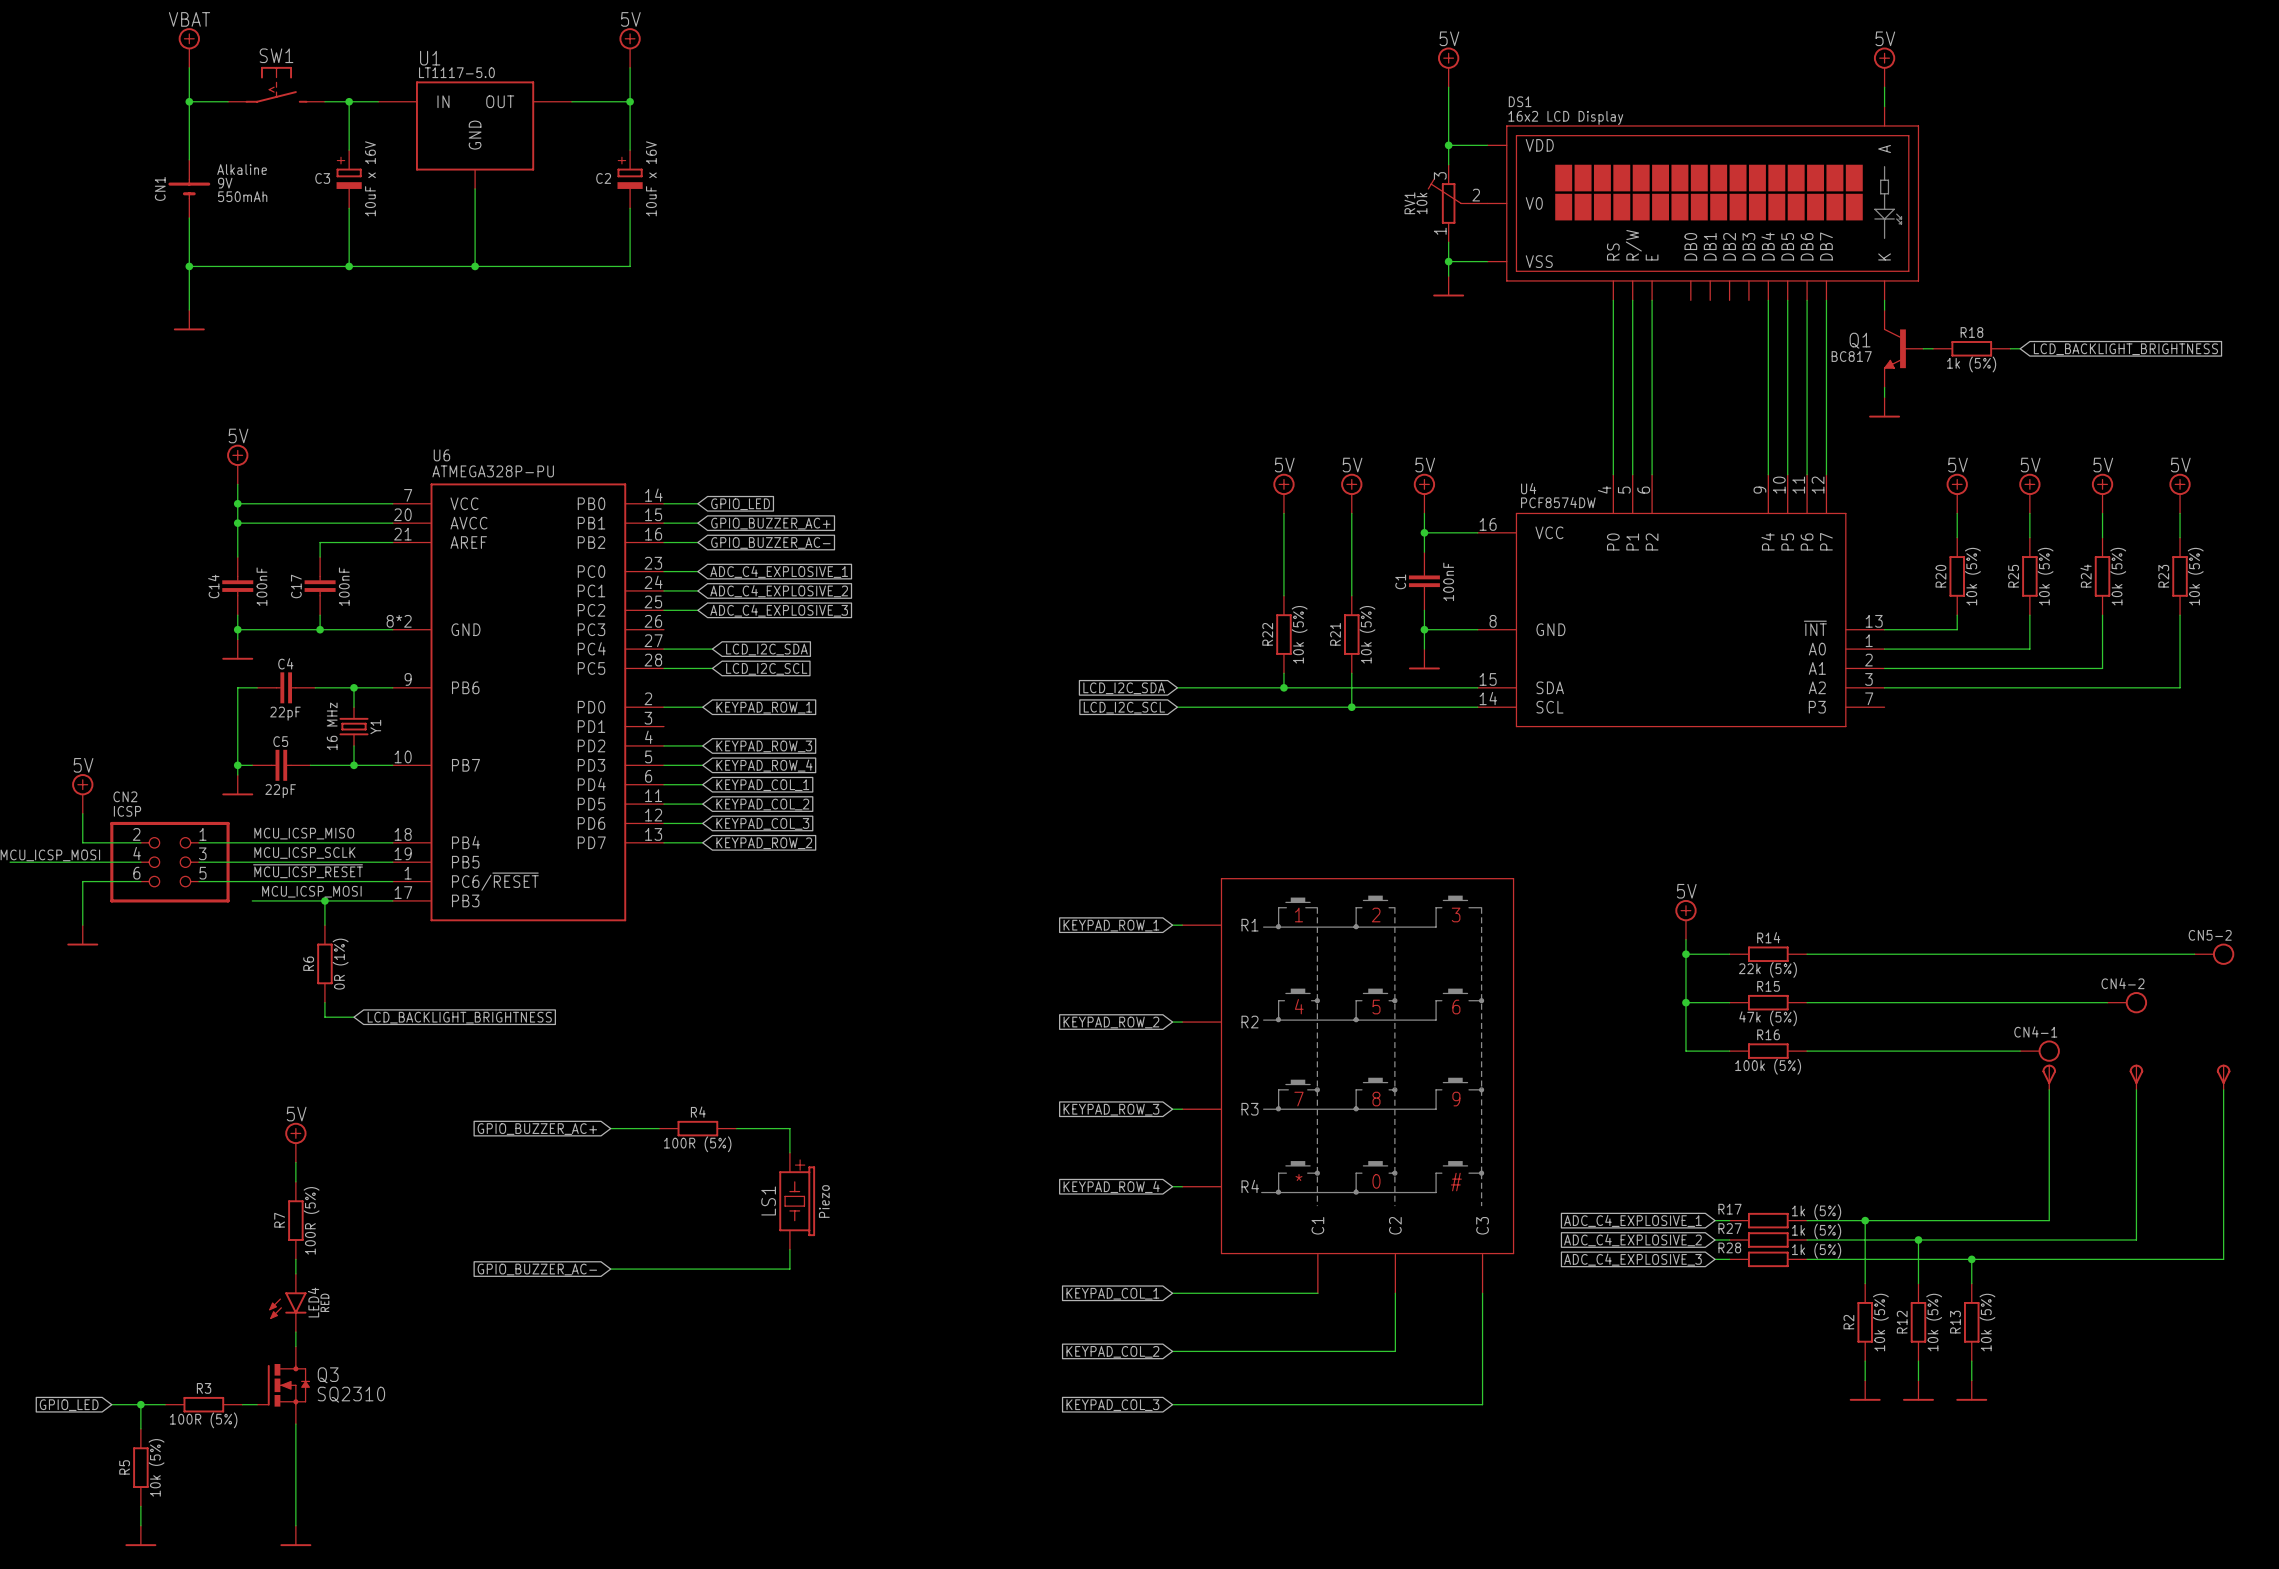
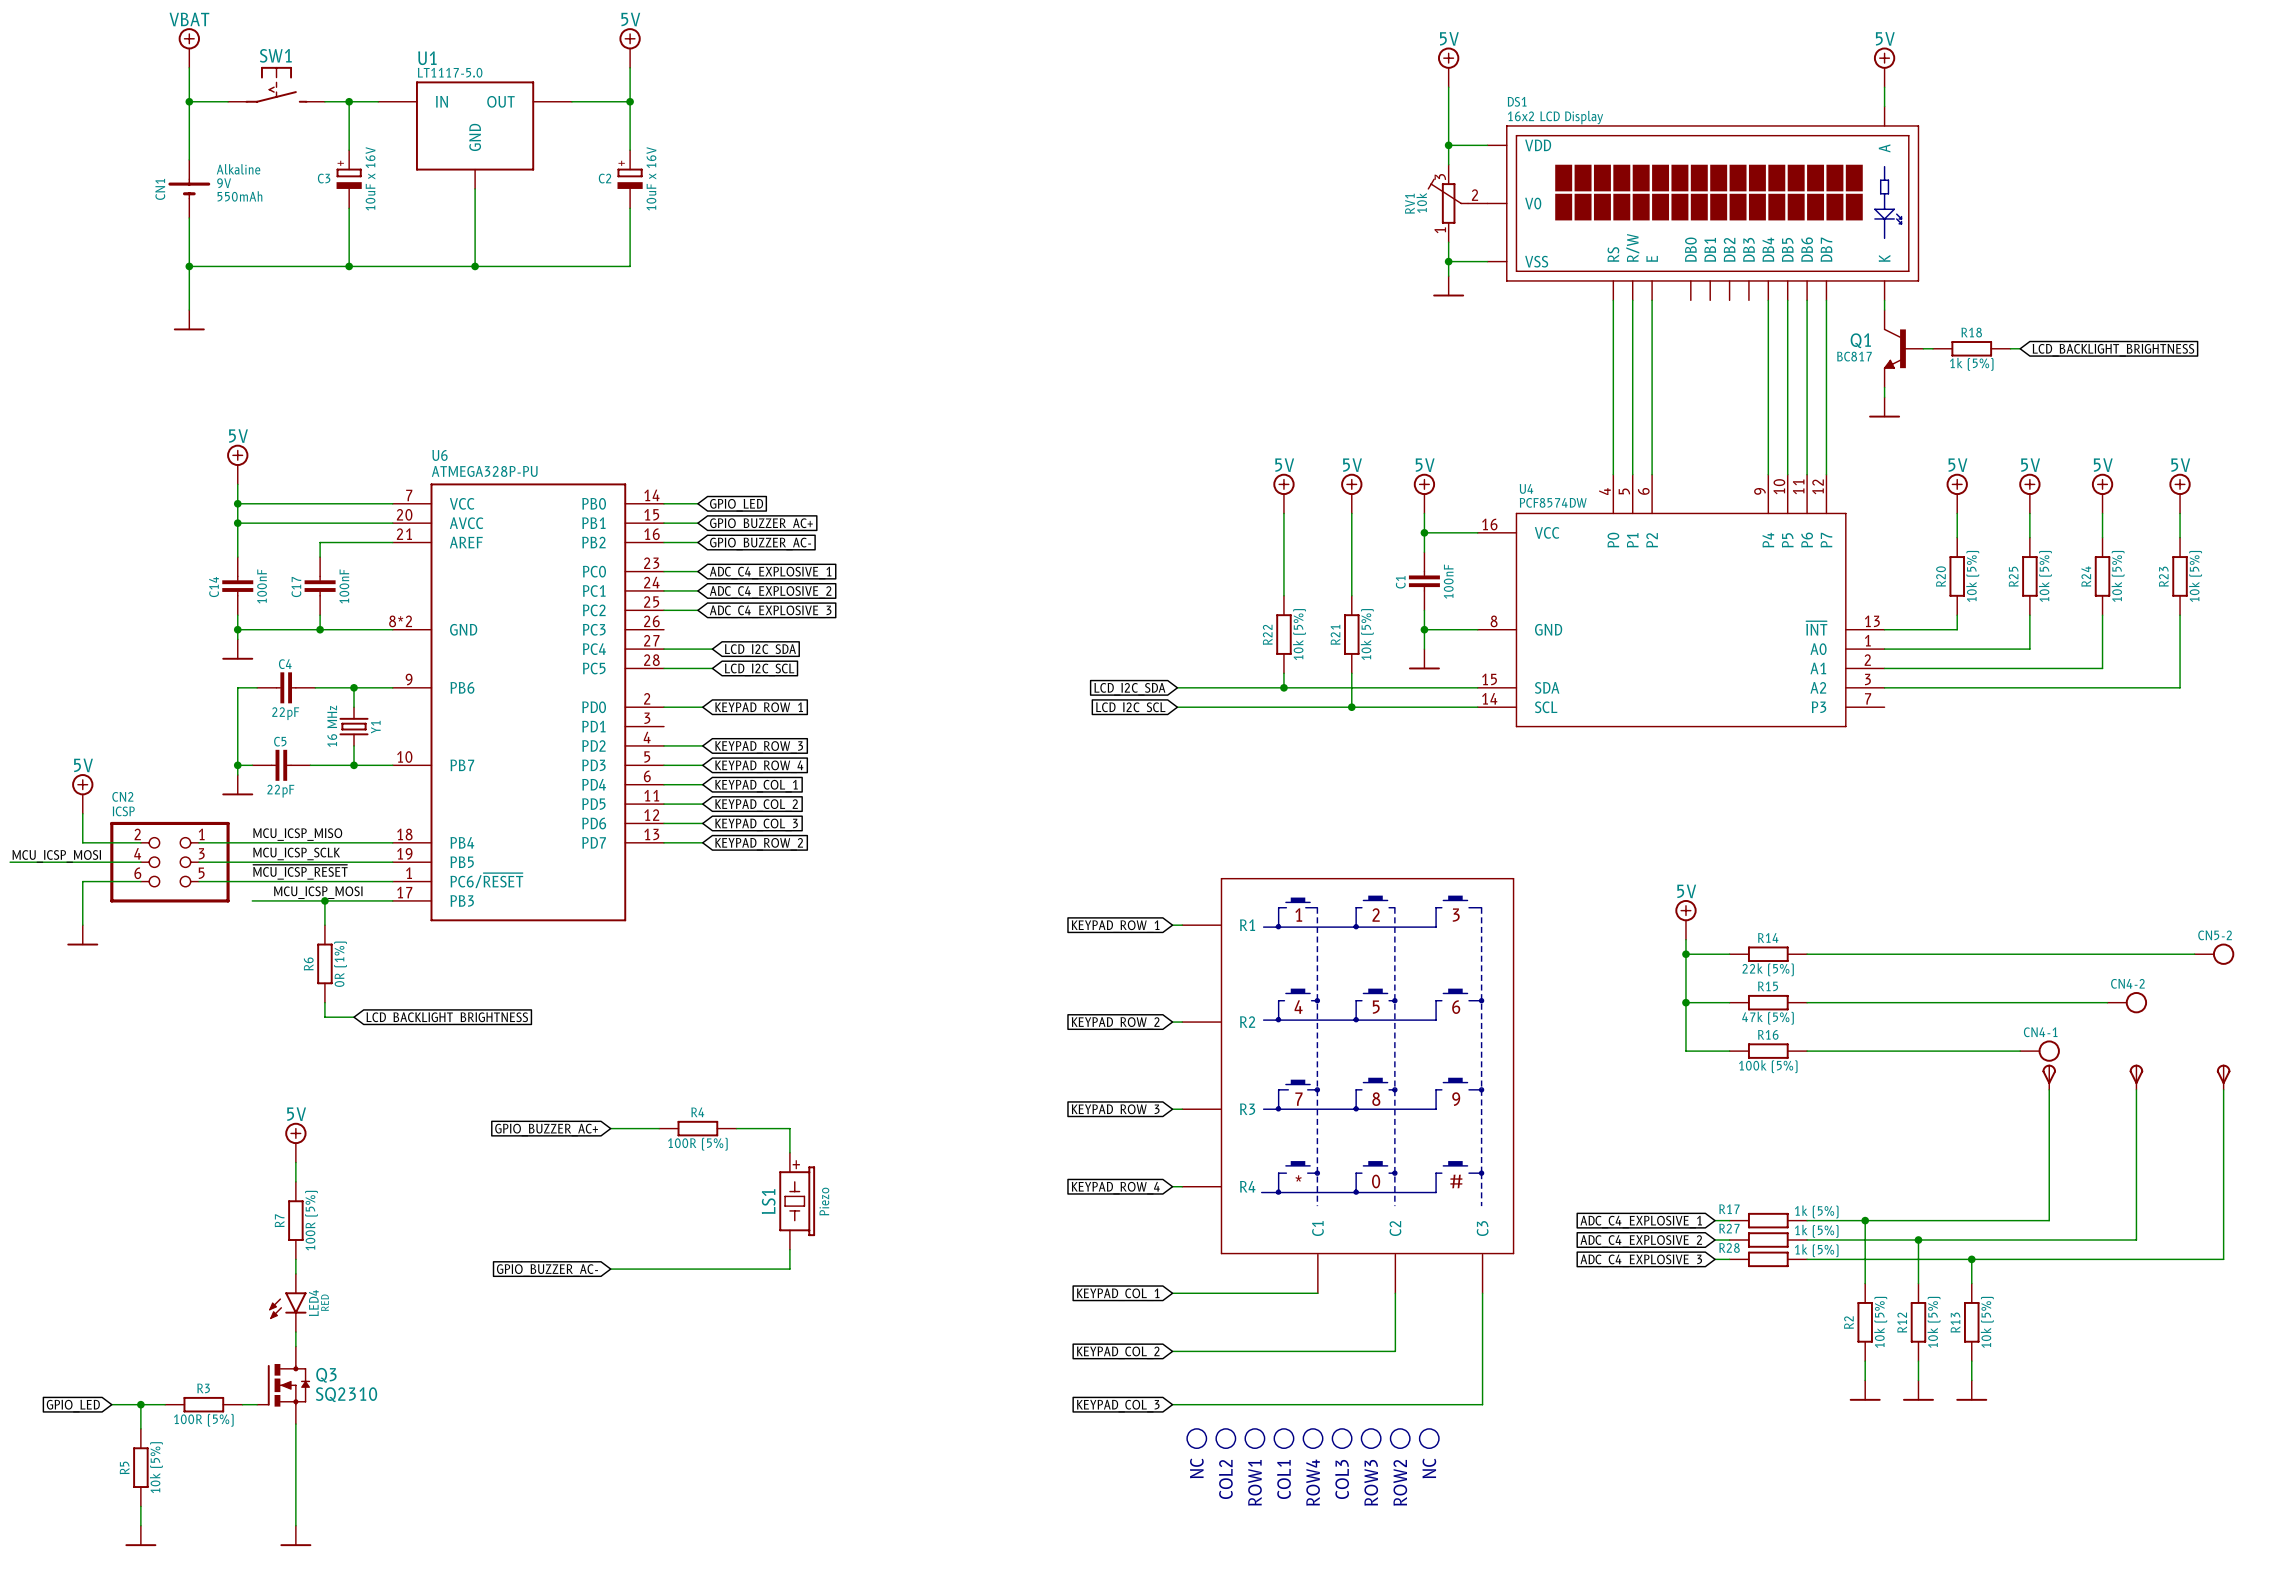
part: none -> (1313, 1438)

